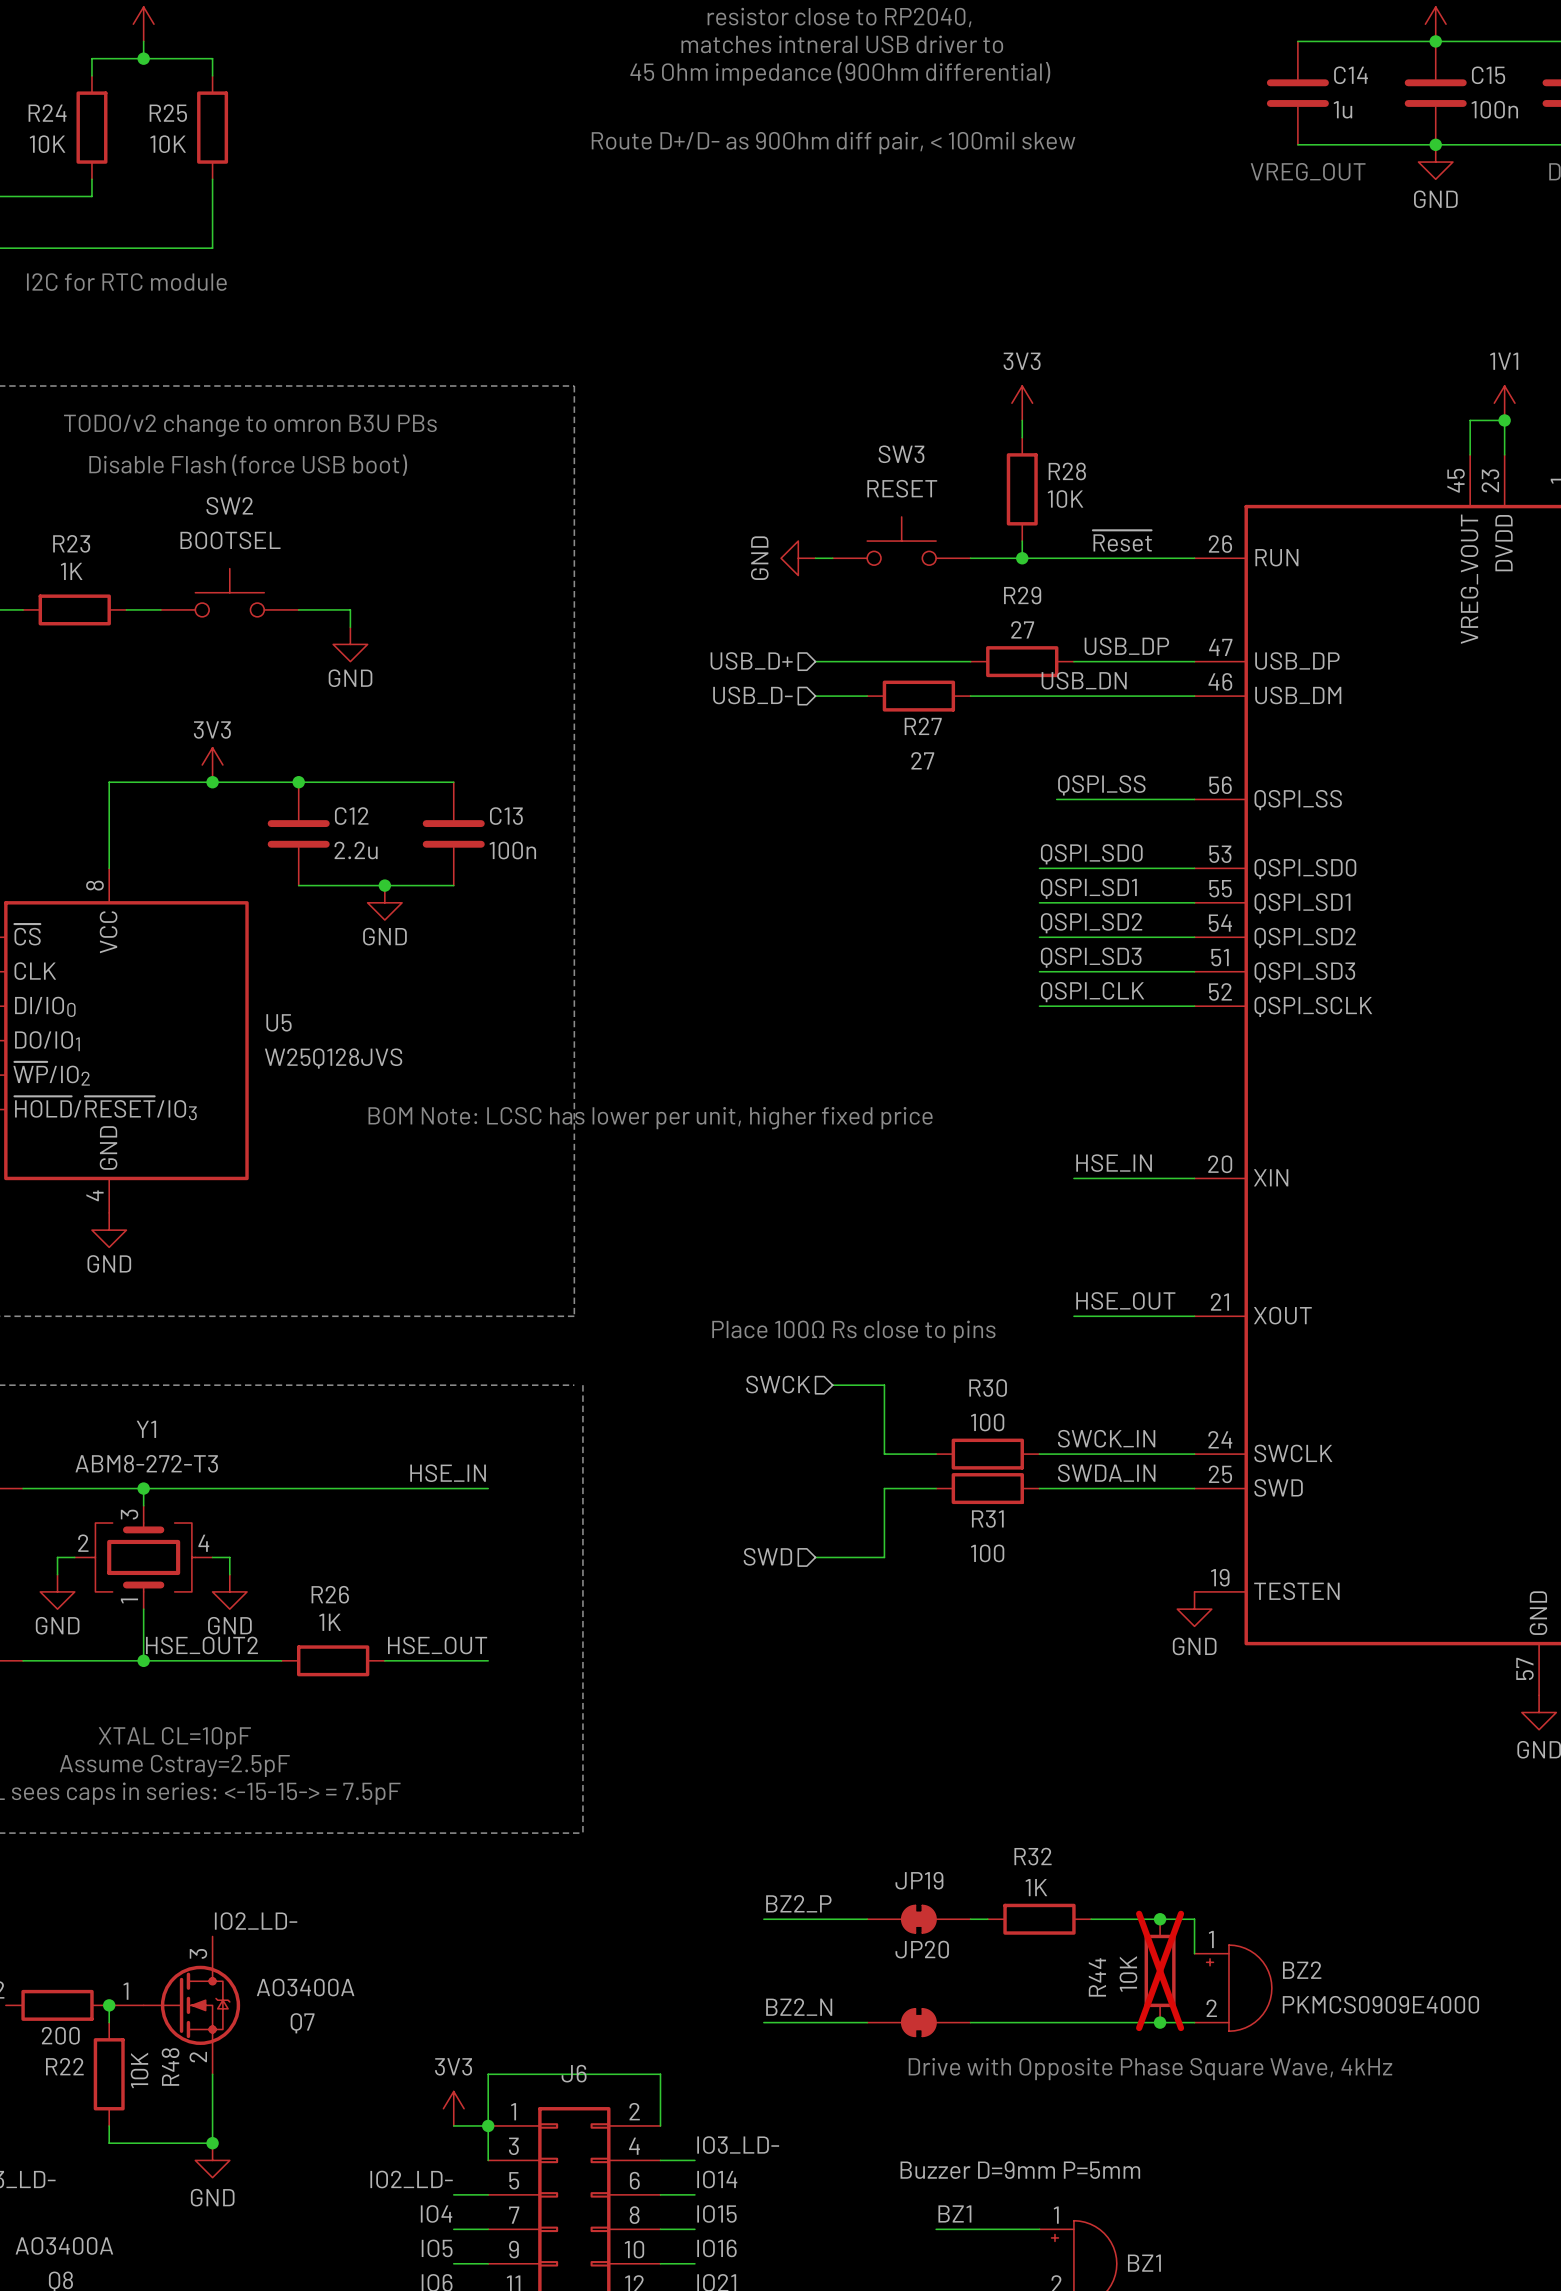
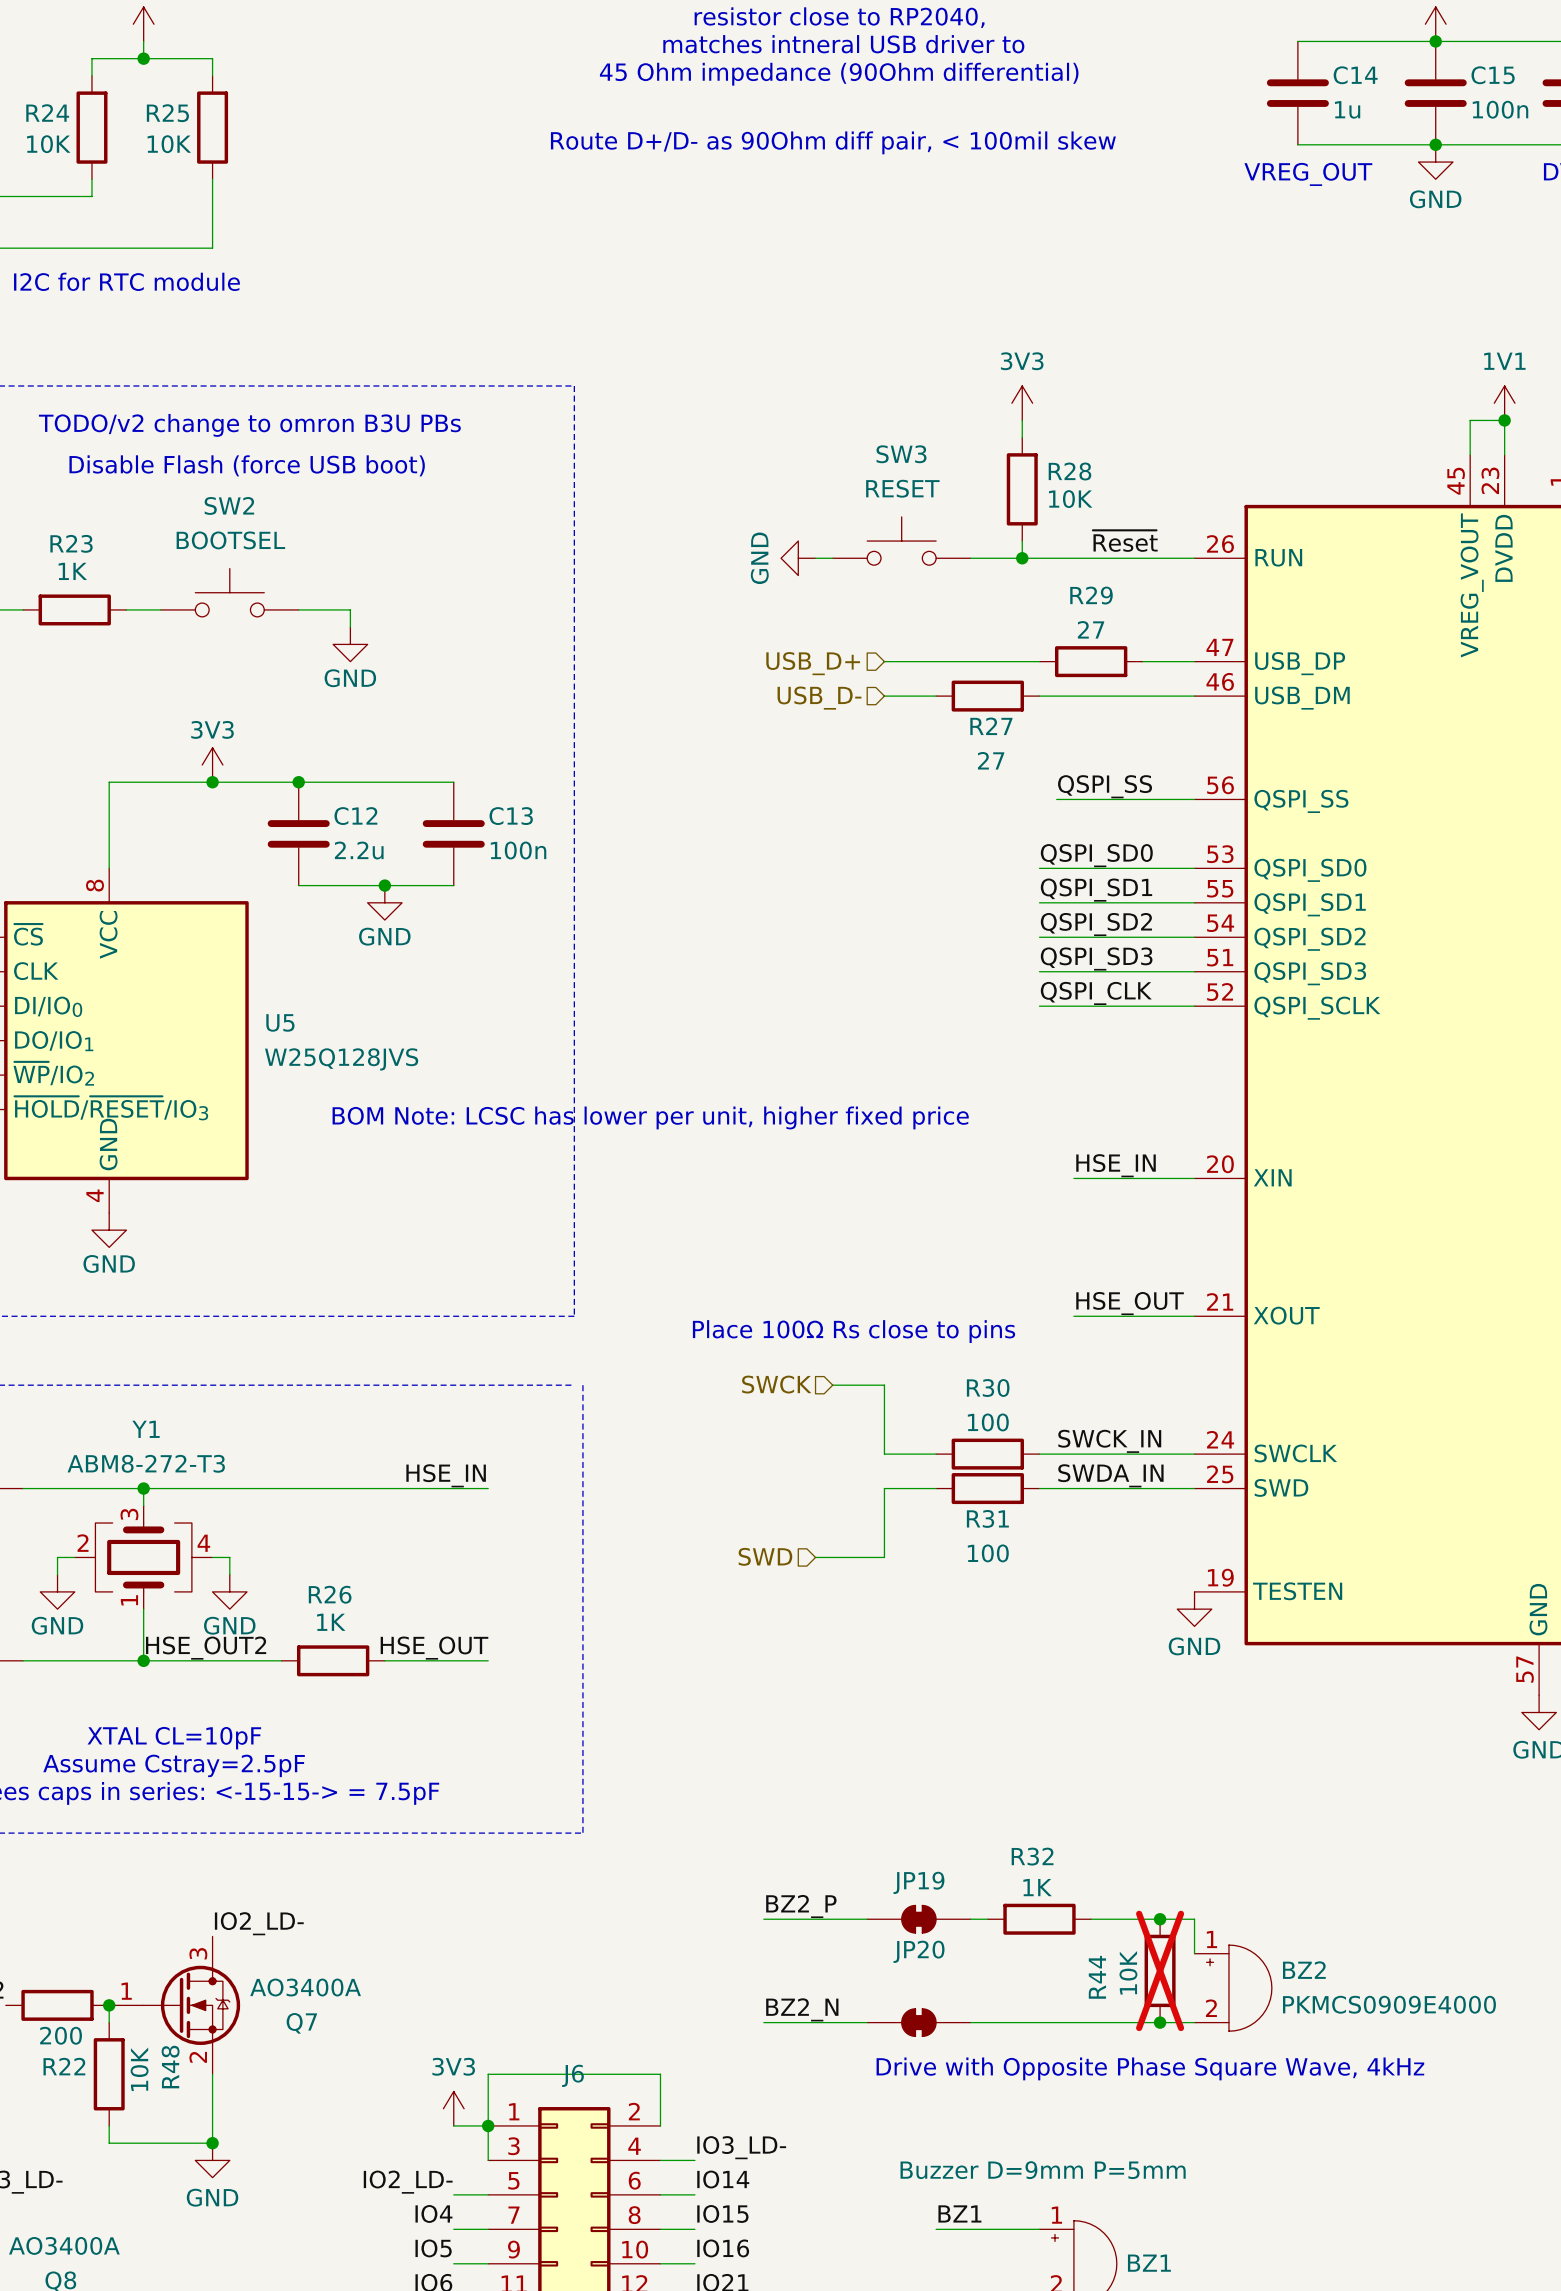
label: USB_DP (1126, 646) -> none
hierarchical label position: USB_D+ (751, 660) -> USB_D+ (813, 663)
wire: (815, 661) (884, 661) -> none
R29 position: (1022, 661) -> (1091, 661)
wire: (1073, 661) (1142, 661) -> none
label: USB_DN (1084, 680) -> none
hierarchical label position: USB_D- (752, 695) -> USB_D- (819, 698)
wire: (815, 696) (867, 696) -> (884, 696) (936, 696)
R27 position: (918, 696) -> (987, 696)
wire: (970, 696) (1039, 696) -> (970, 661) (1039, 661)

